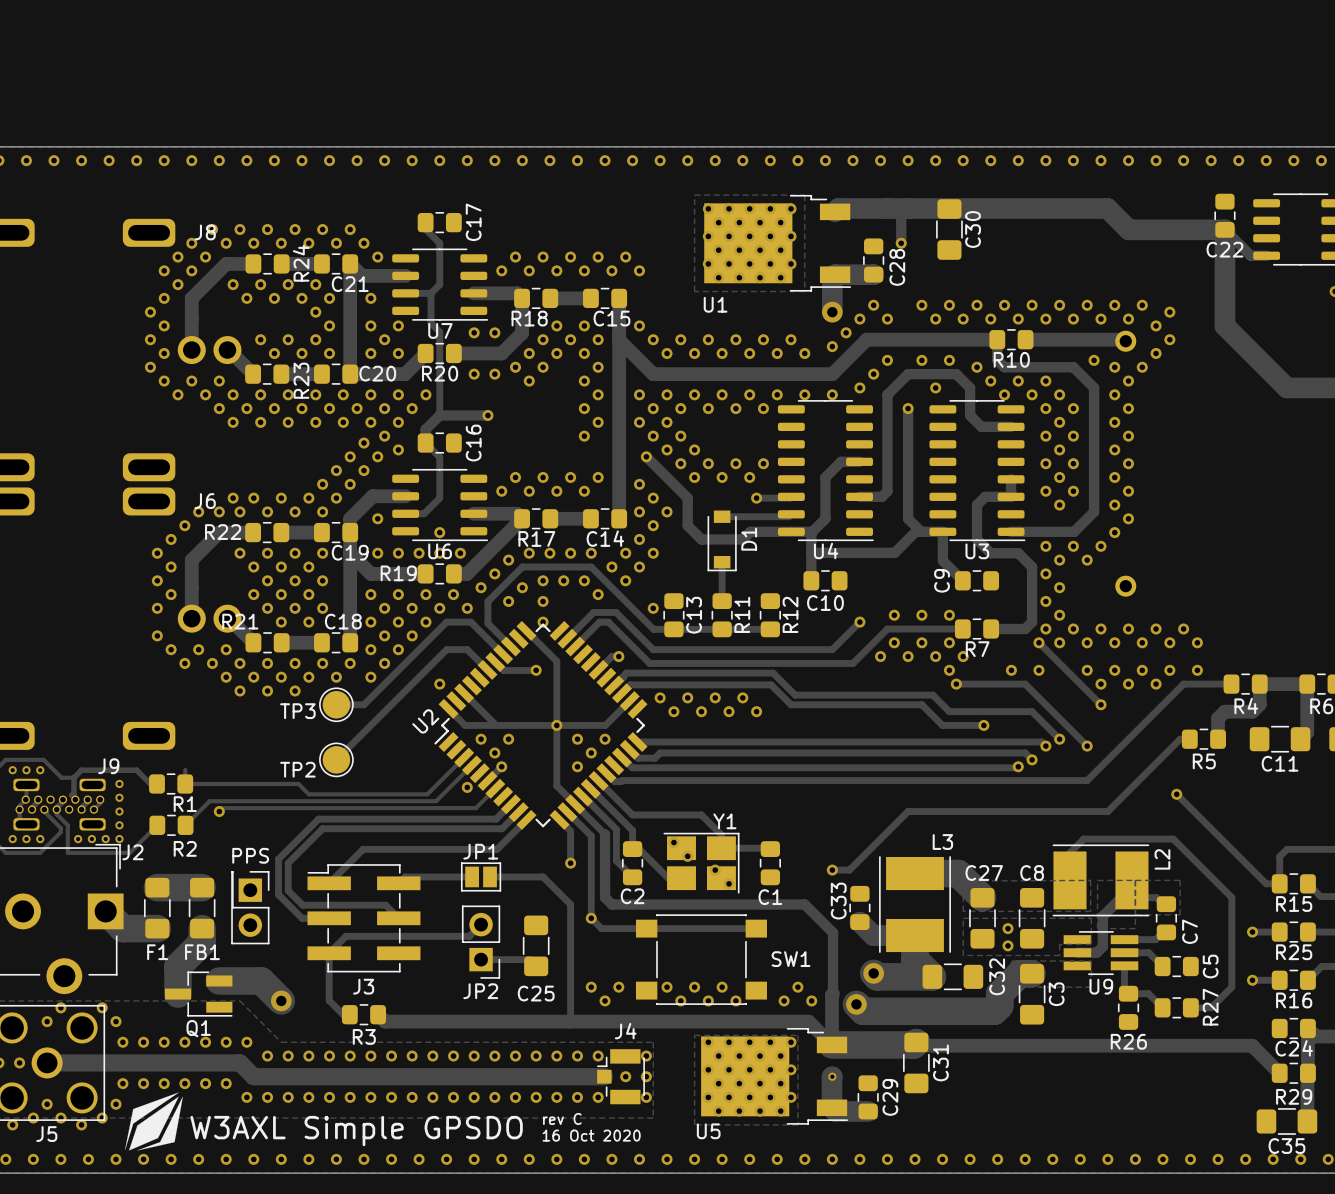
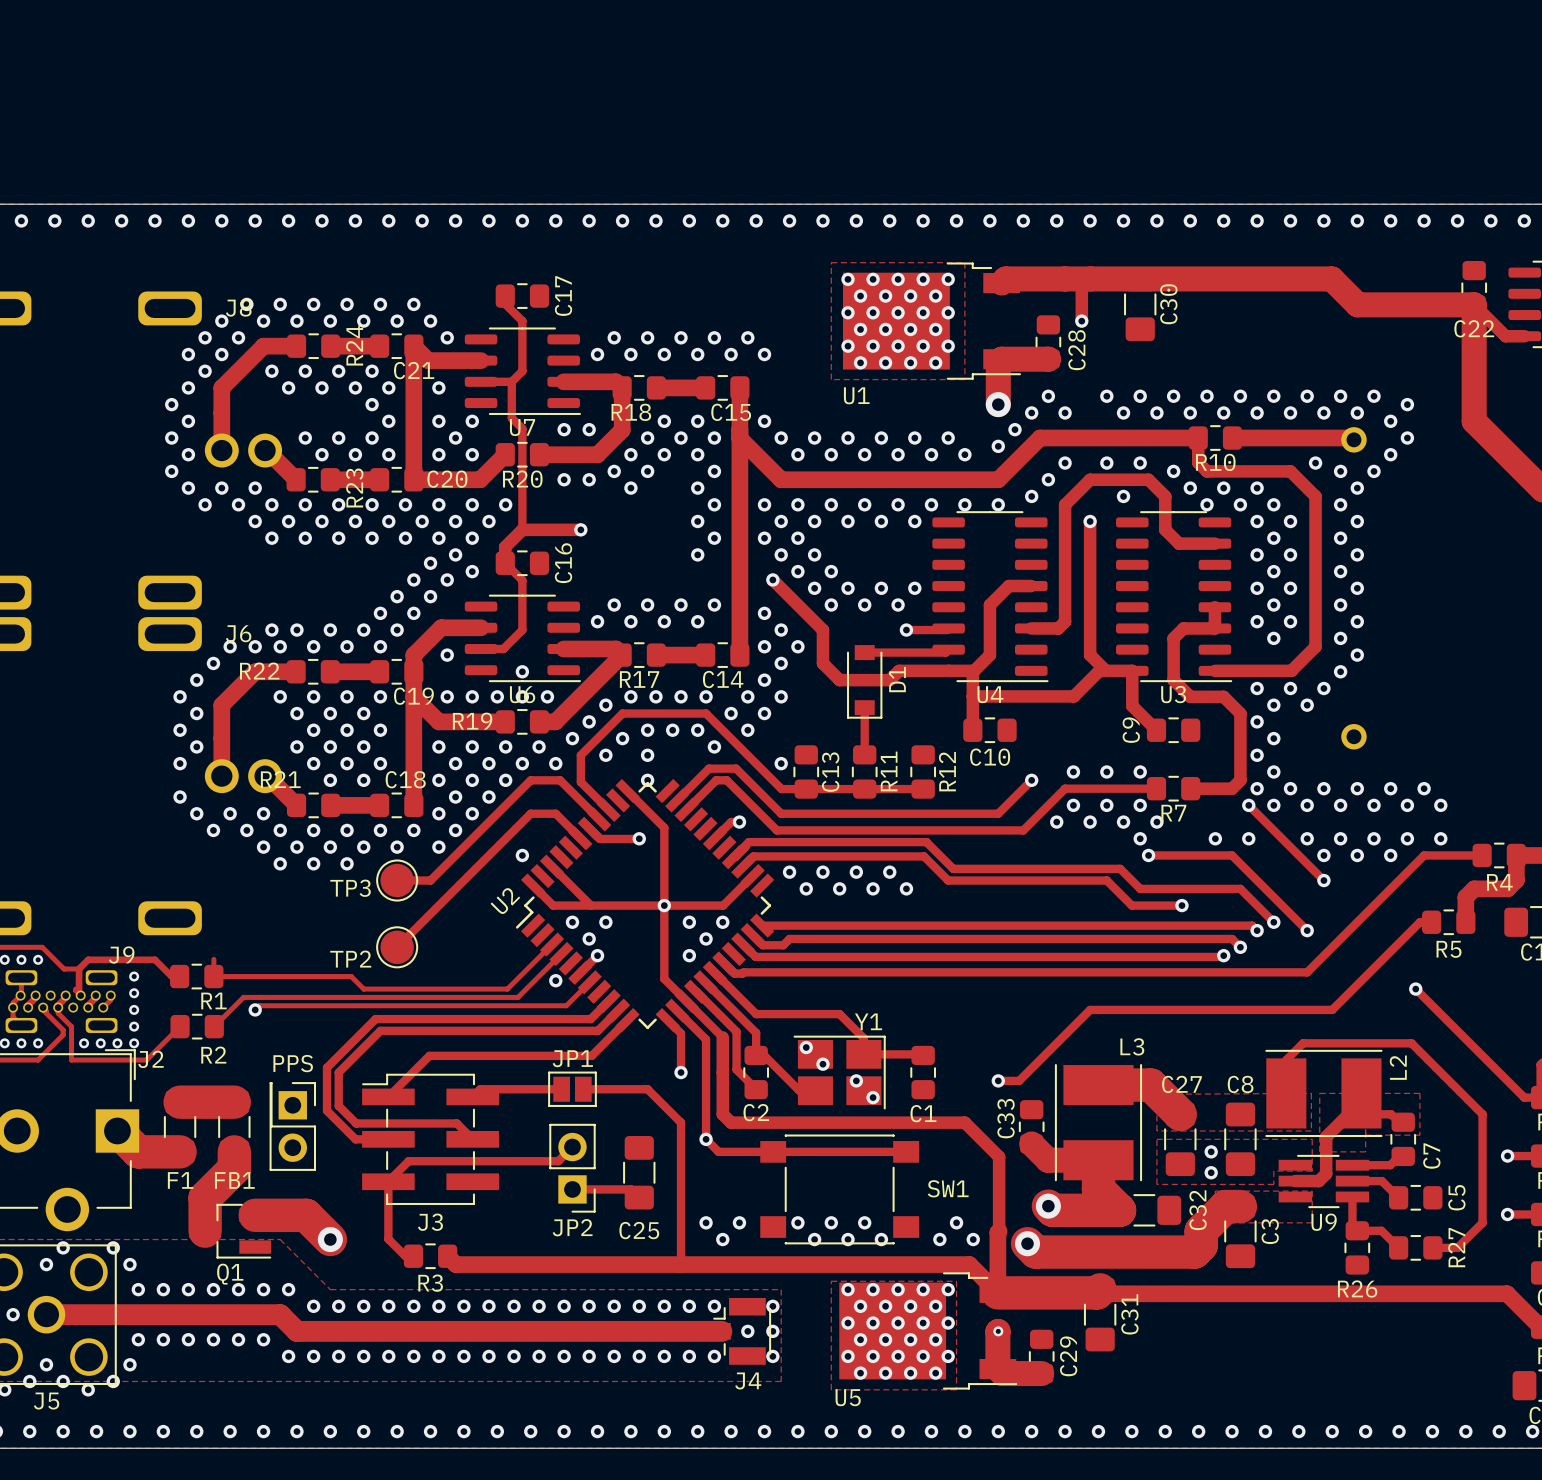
J4 name position: J4 (625, 1031) -> J4 (748, 1380)
drawing: [125, 1092, 183, 1151] -> none
text: rev C (562, 1118) -> none
text: W3AXL Simple GPSDO (356, 1131) -> none
text: 16 Oct 2020 (591, 1135) -> none

